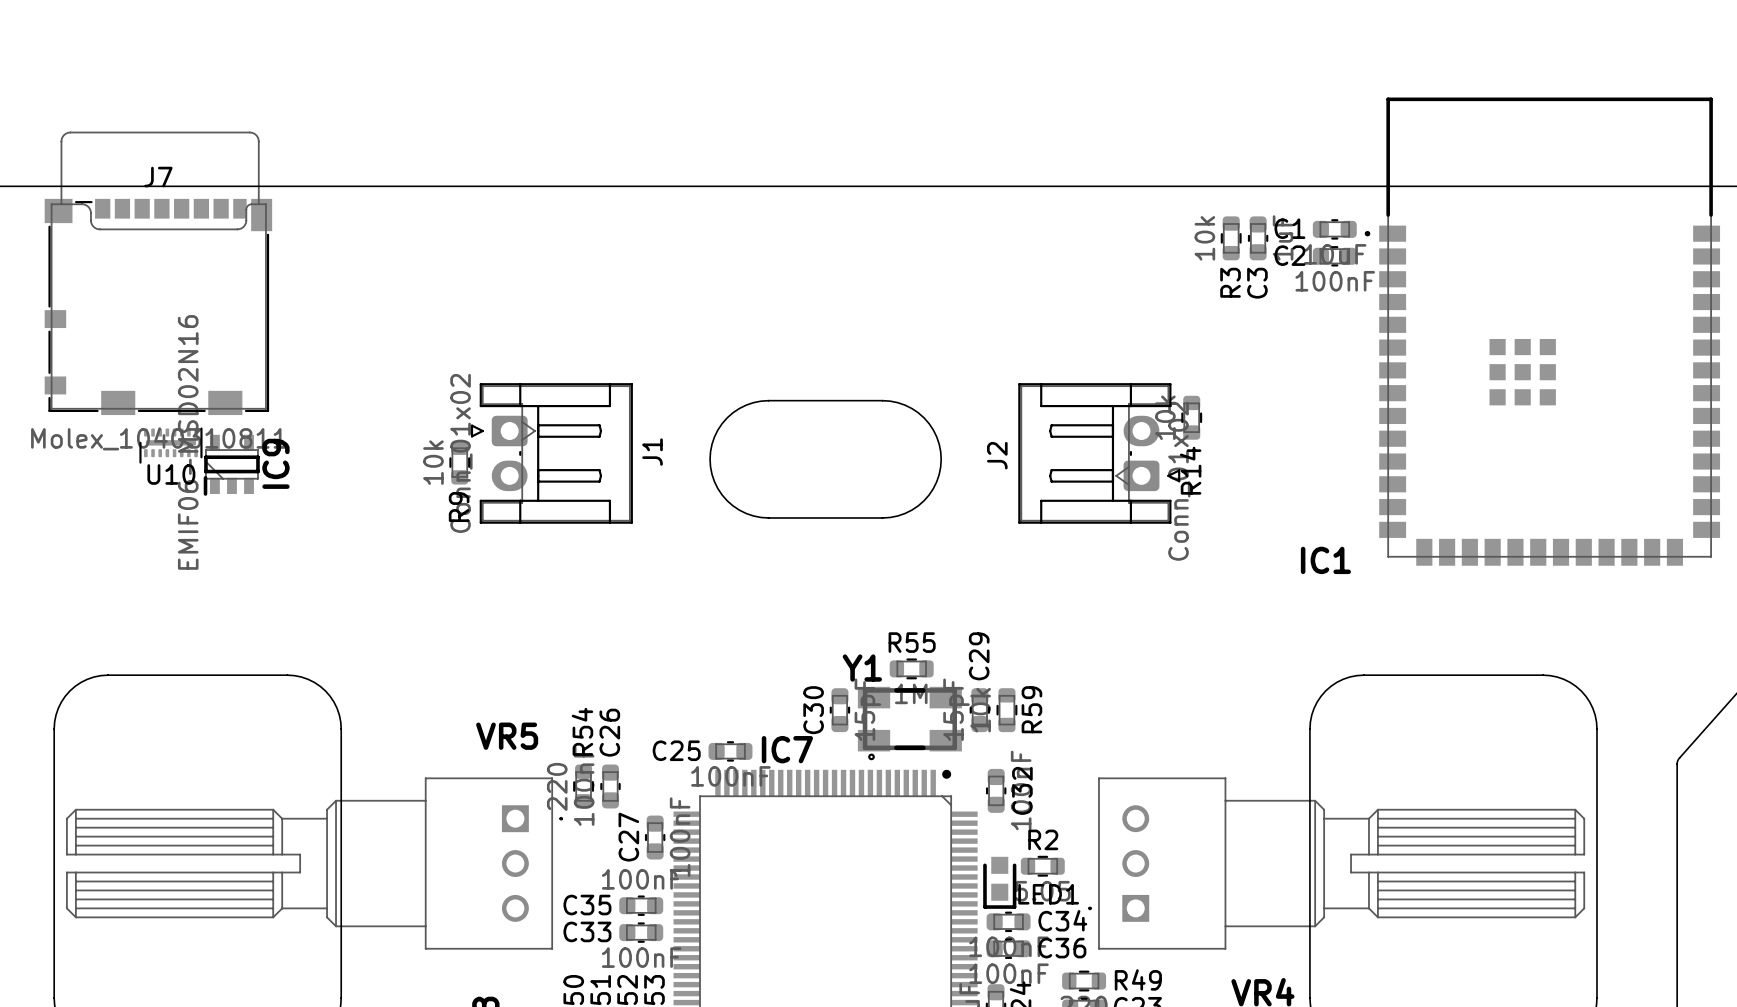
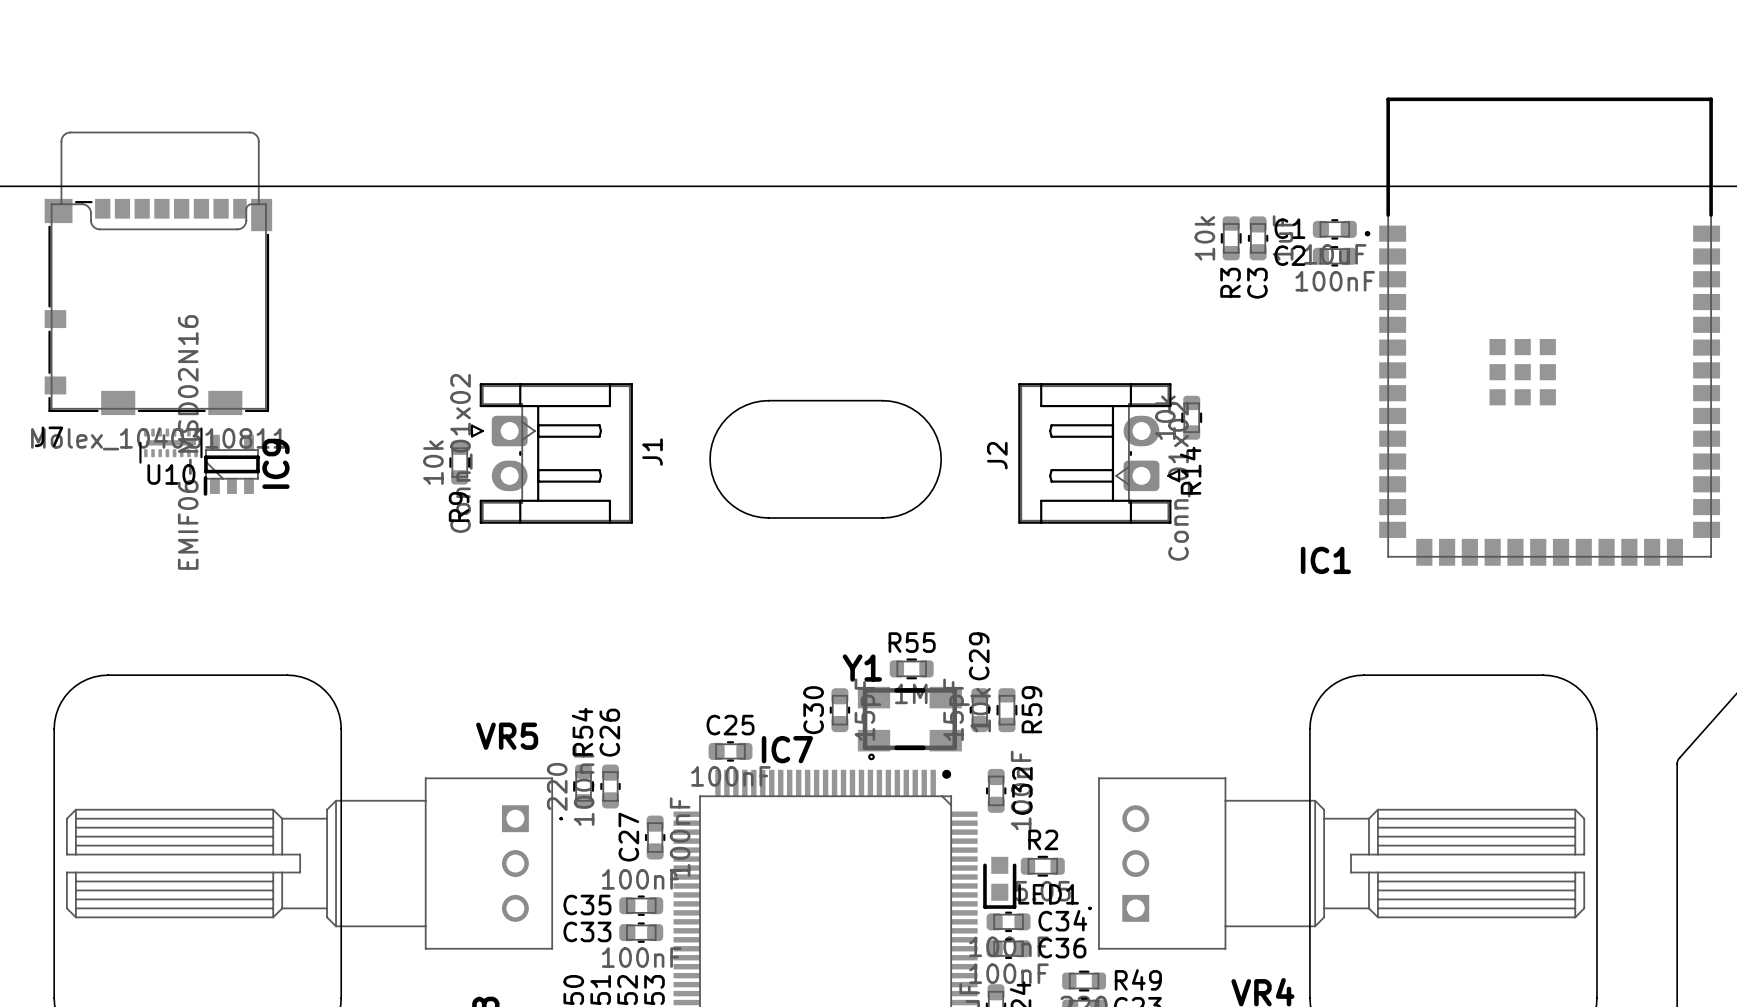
J7 name position: J7 (158, 177) -> J7 (48, 436)
C25 name position: C25 (676, 750) -> C25 (730, 725)

